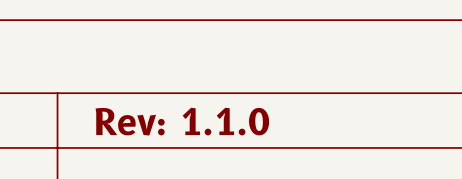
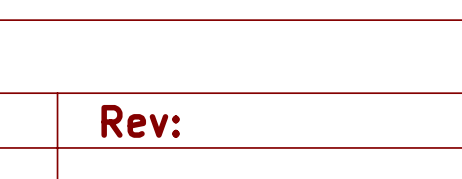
title block: Rev: 1.1.0 (182, 121) -> Rev: (140, 121)

